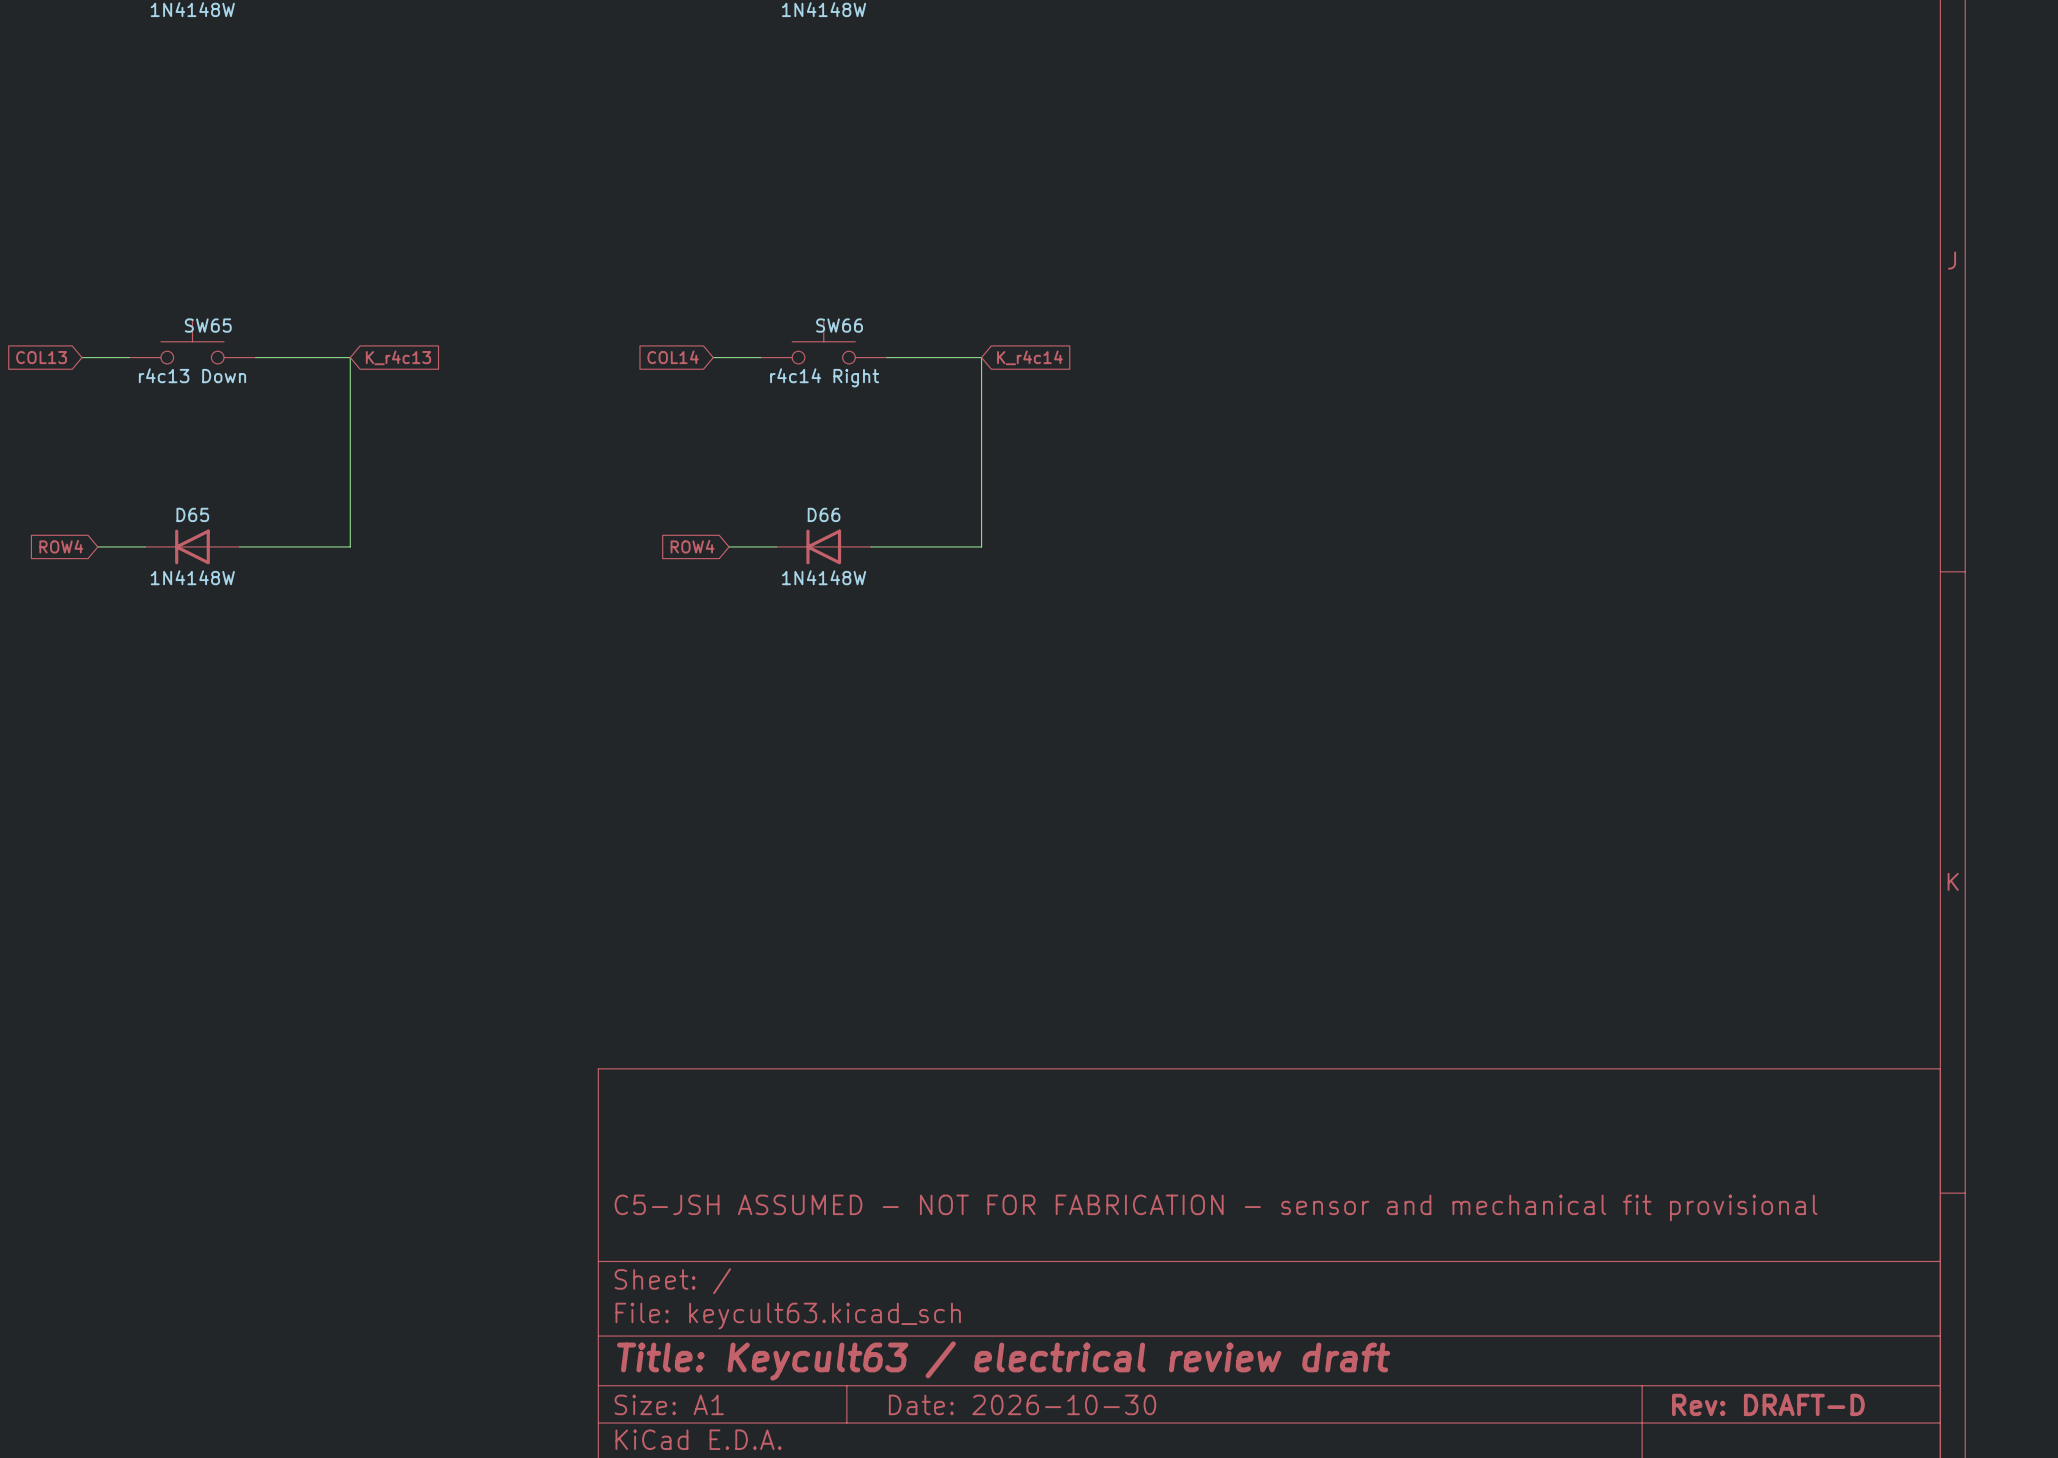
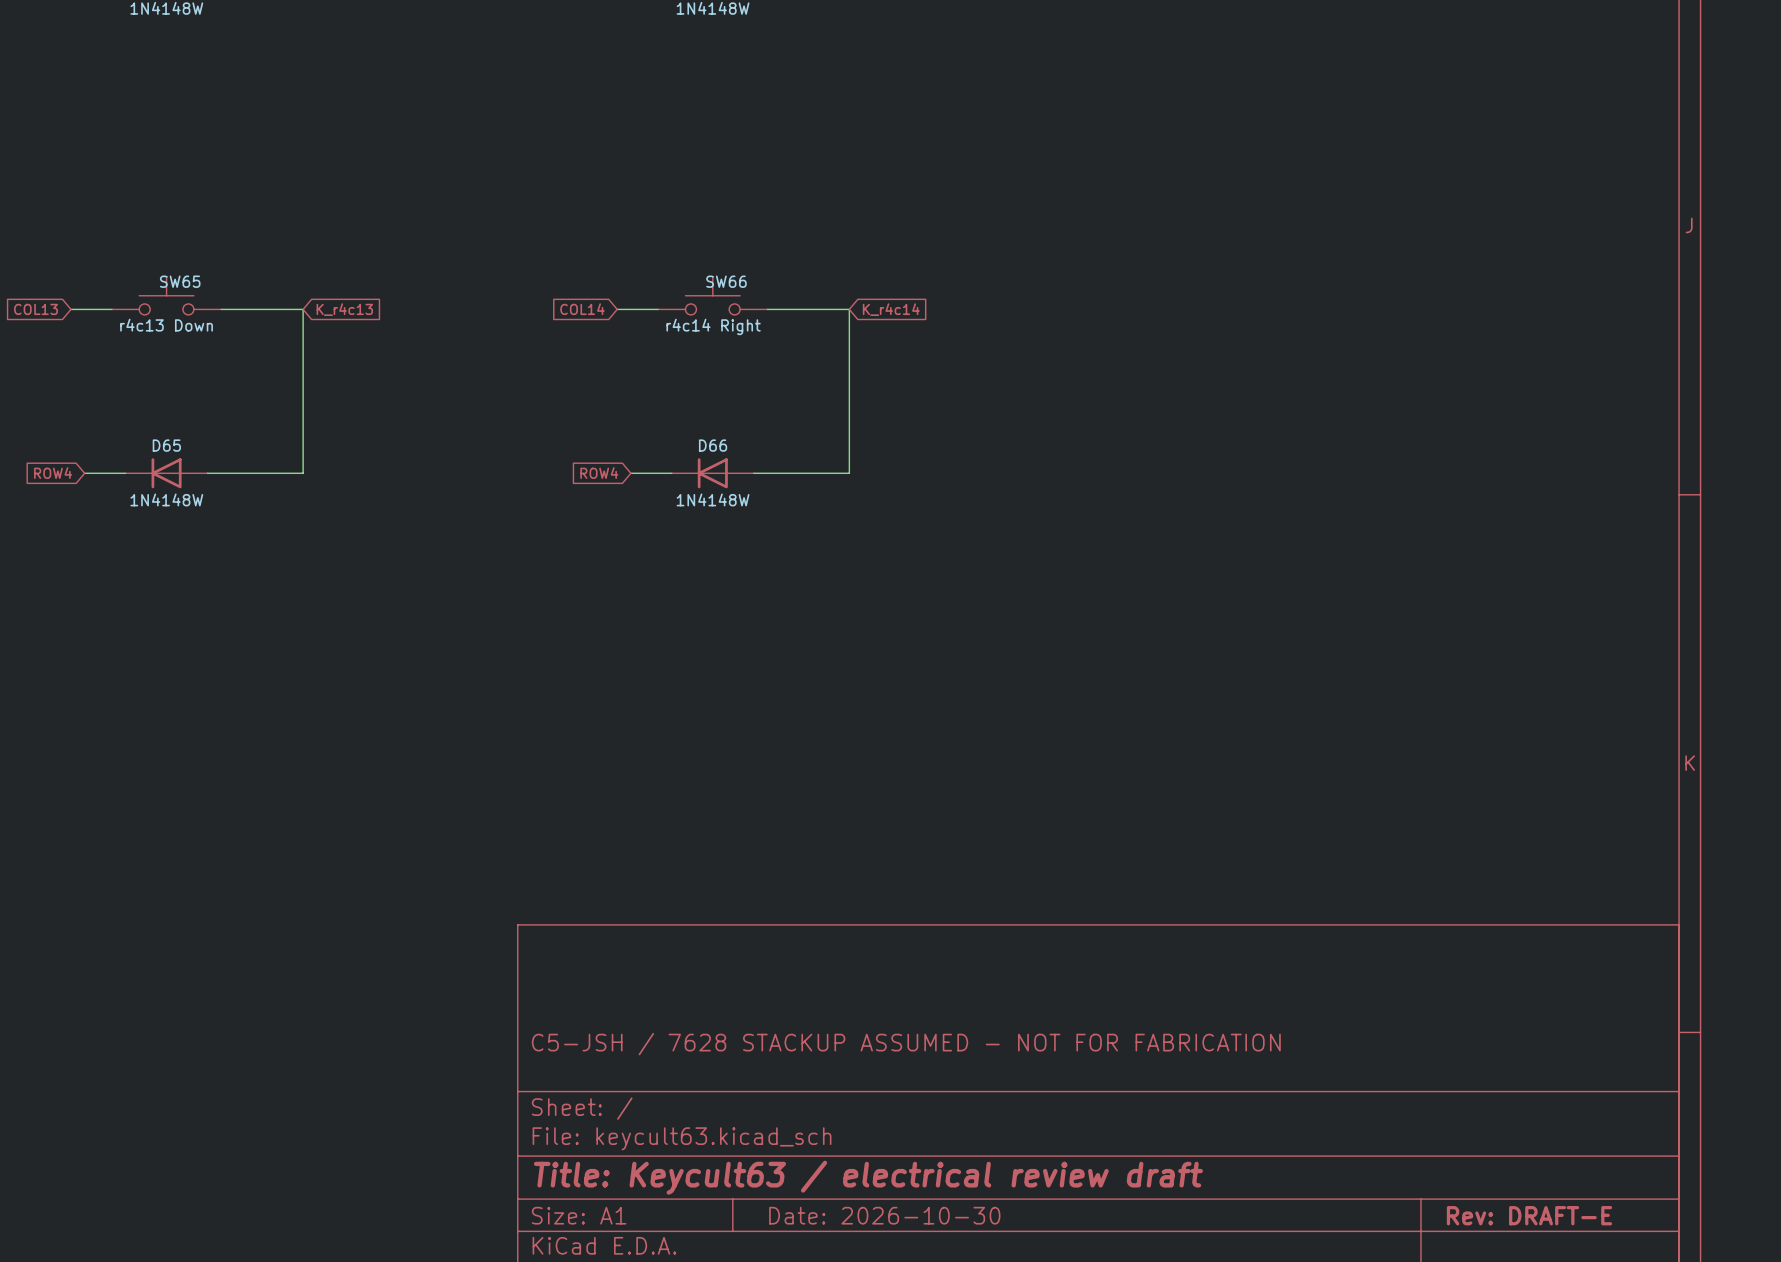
title block: C5-JSH ASSUMED - NOT FOR FABRICATION - sensor and mechanical fit provisional (1216, 1207) -> C5-JSH / 7628 STACKUP ASSUMED - NOT FOR FABRICATION (906, 1044)
title block: Rev: DRAFT-D (1768, 1404) -> Rev: DRAFT-E (1529, 1215)

